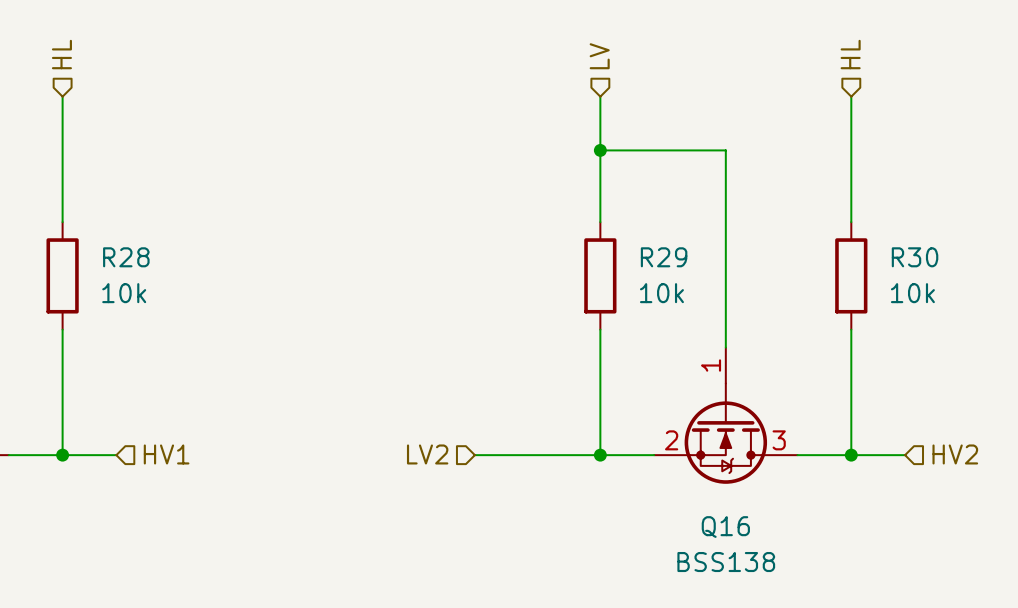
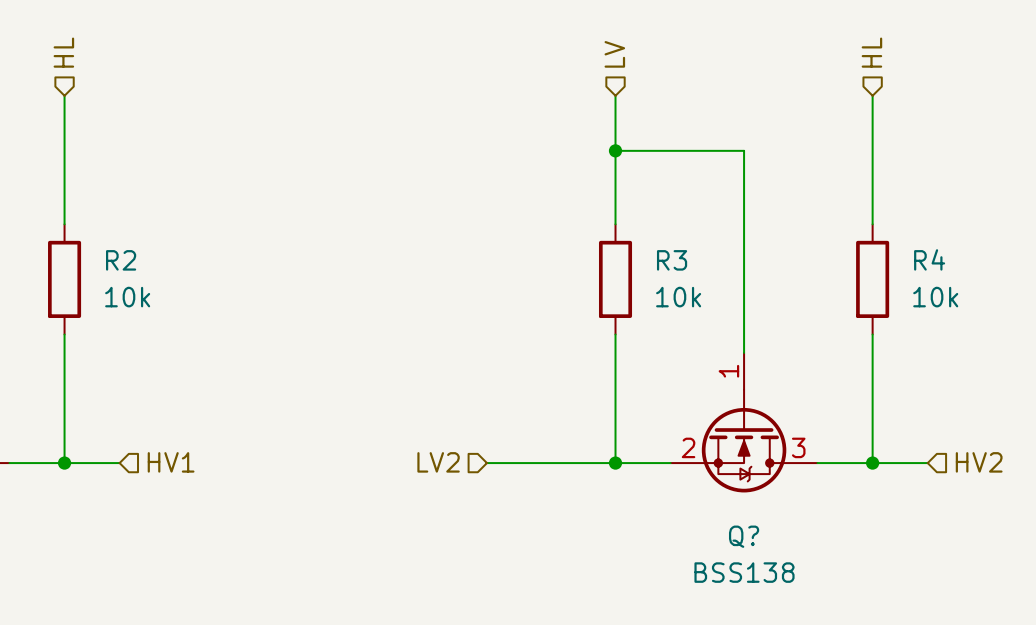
R28 name: R28 (126, 257) -> R2 (121, 260)
R29 name: R29 (664, 257) -> R3 (672, 260)
R30 name: R30 (915, 257) -> R4 (929, 259)
Q16 name: Q16 (725, 527) -> Q? (744, 536)

